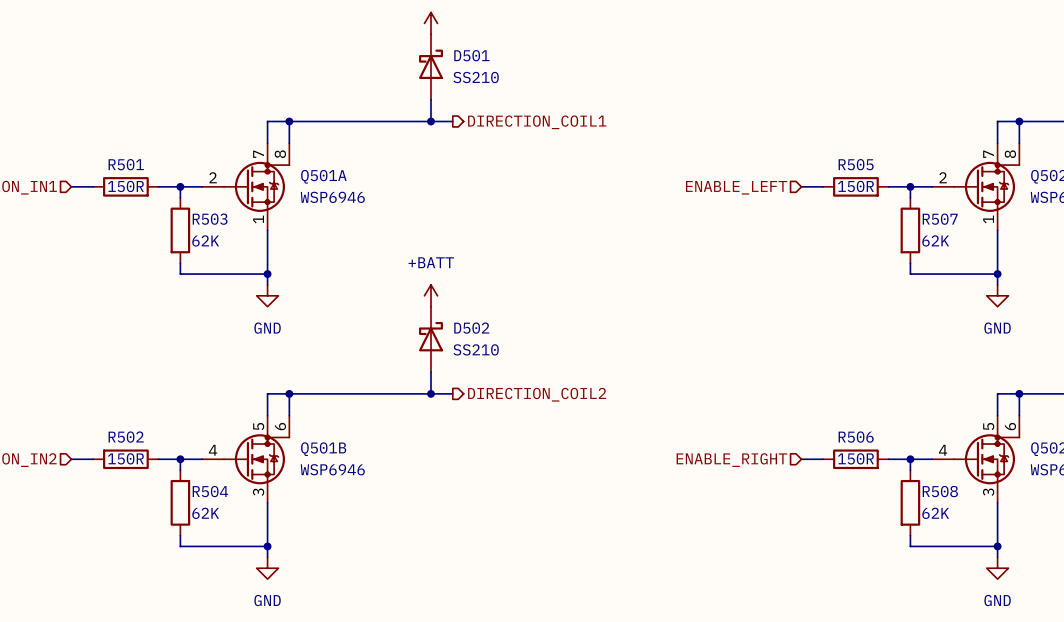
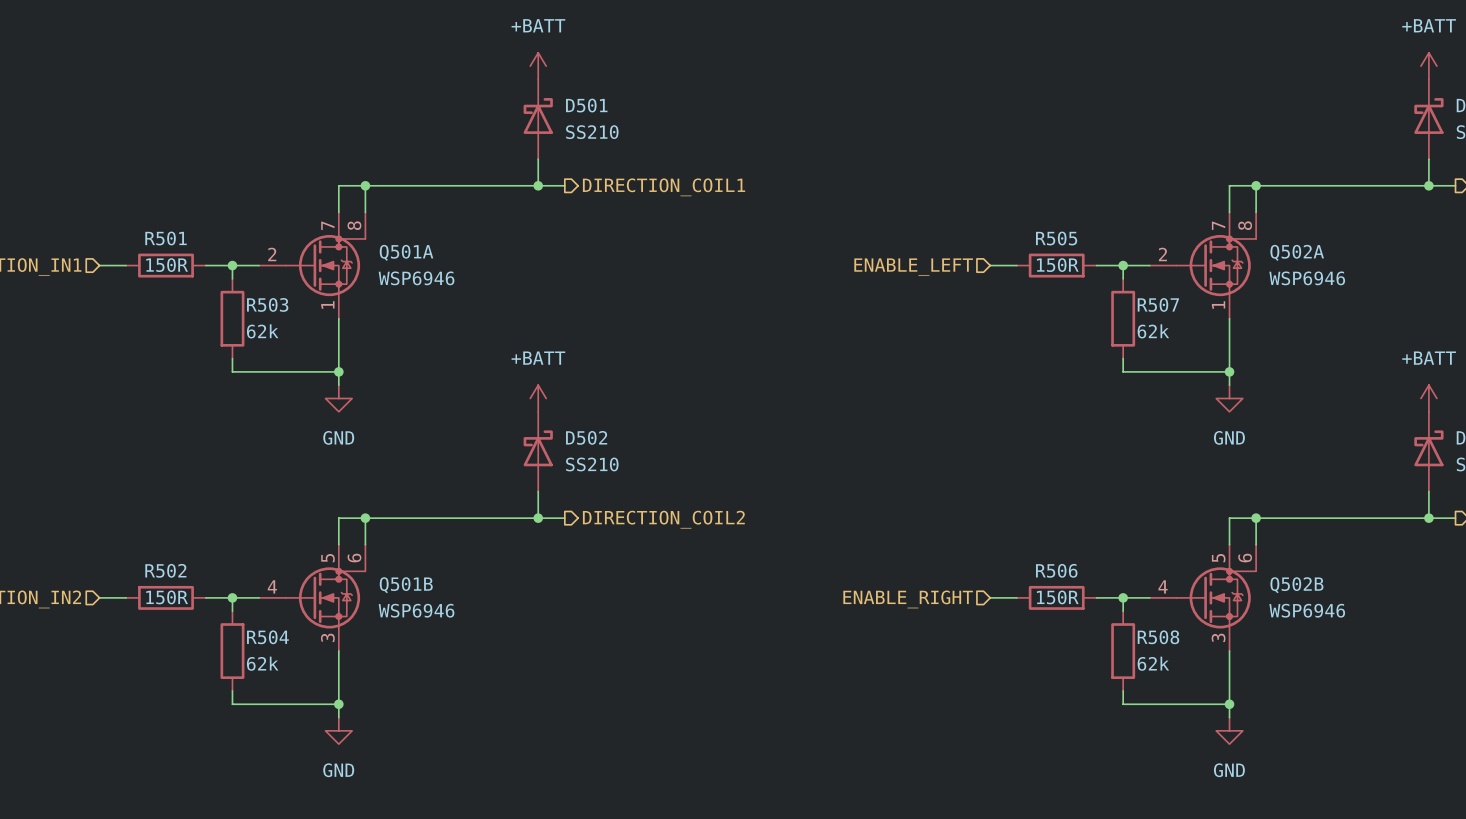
R503 value: 62K (205, 240) -> 62k (262, 331)
R507 value: 62K (935, 240) -> 62k (1153, 331)
R504 value: 62K (205, 513) -> 62k (262, 663)
R508 value: 62K (935, 513) -> 62k (1153, 663)

